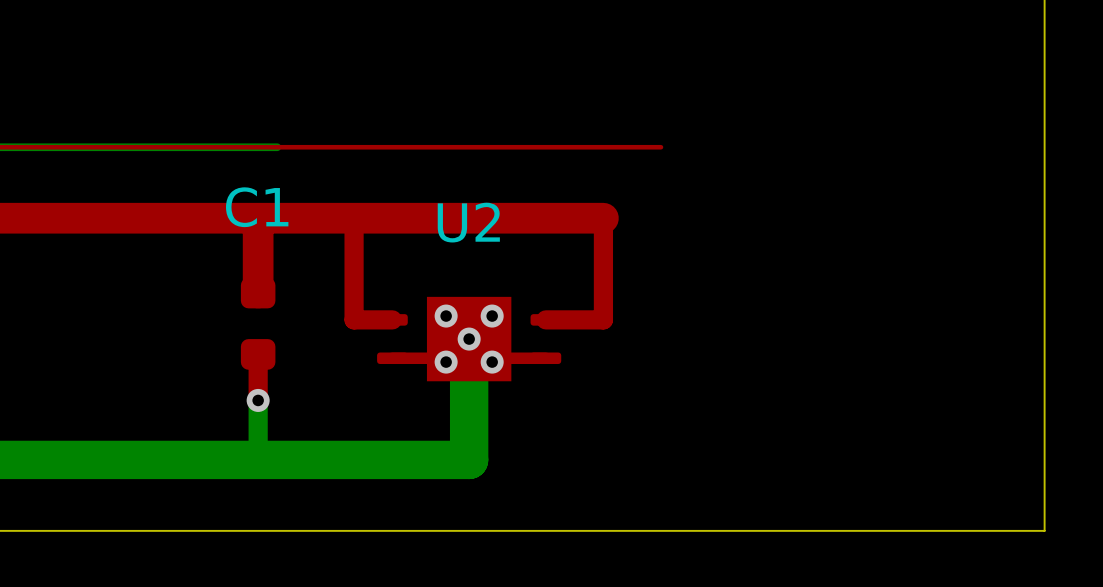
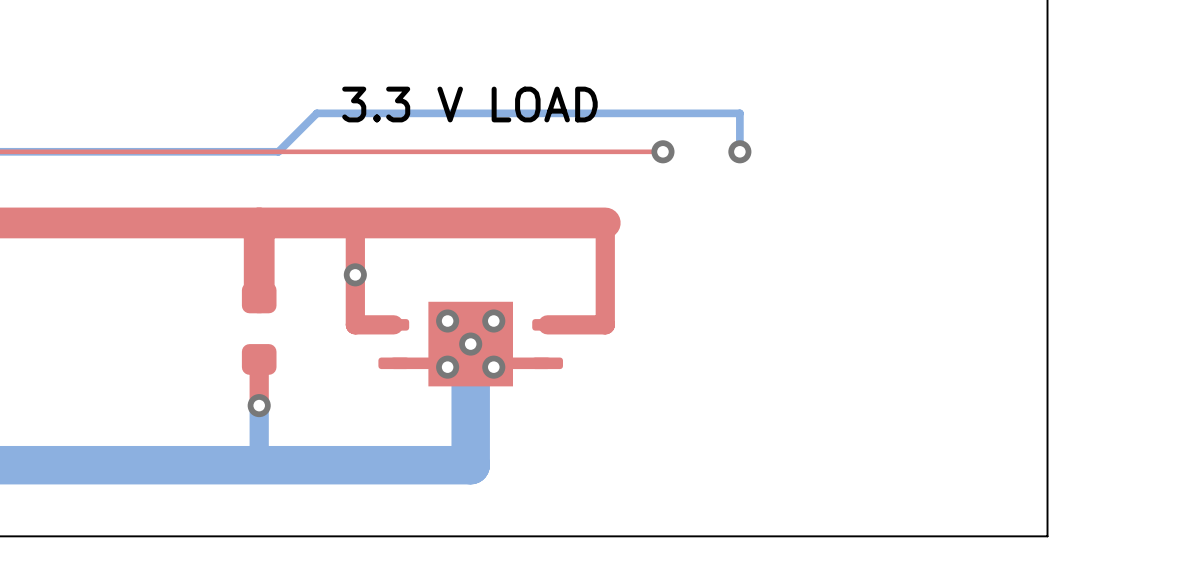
text: none -> 3.3 V LOAD (469, 104)
bottom track: none -> (278, 151) (316, 113) (739, 113) (739, 151)
via: none -> (662, 151)
via: none -> (739, 151)
C1 name: C1 (257, 207) -> none
U2 name: U2 (468, 222) -> none
via: none -> (355, 274)

